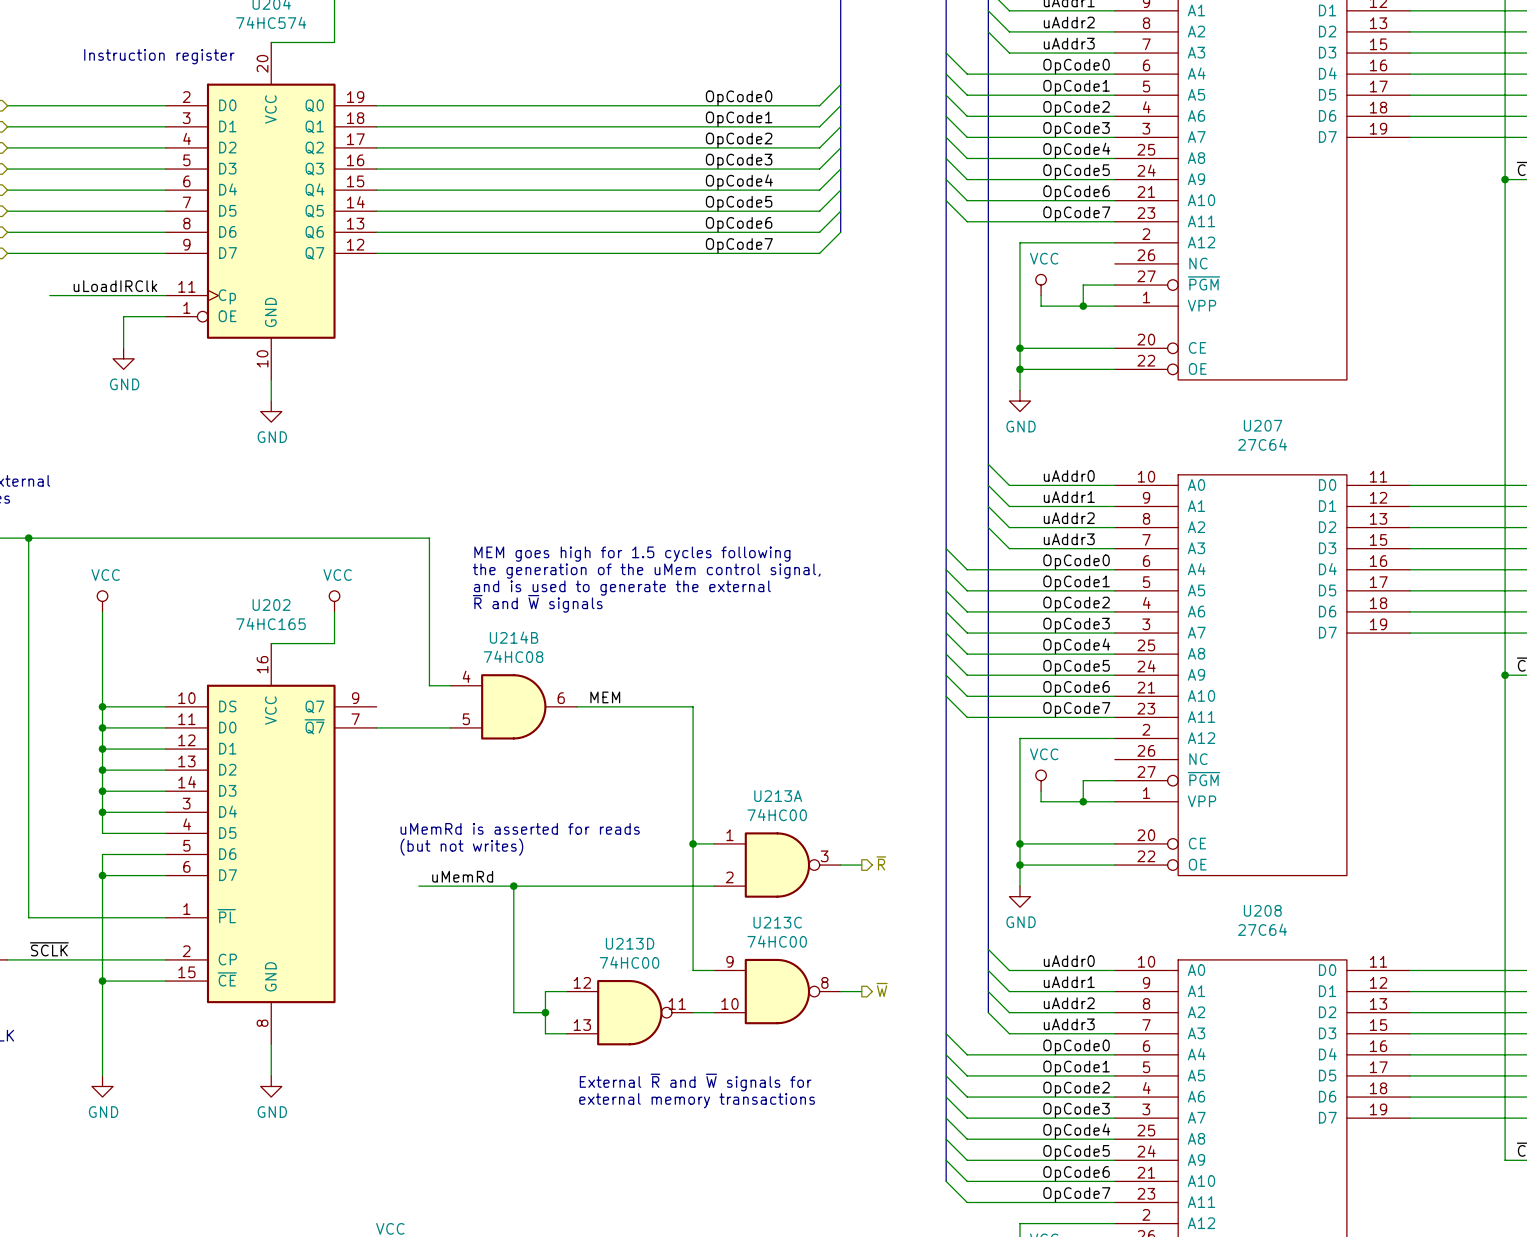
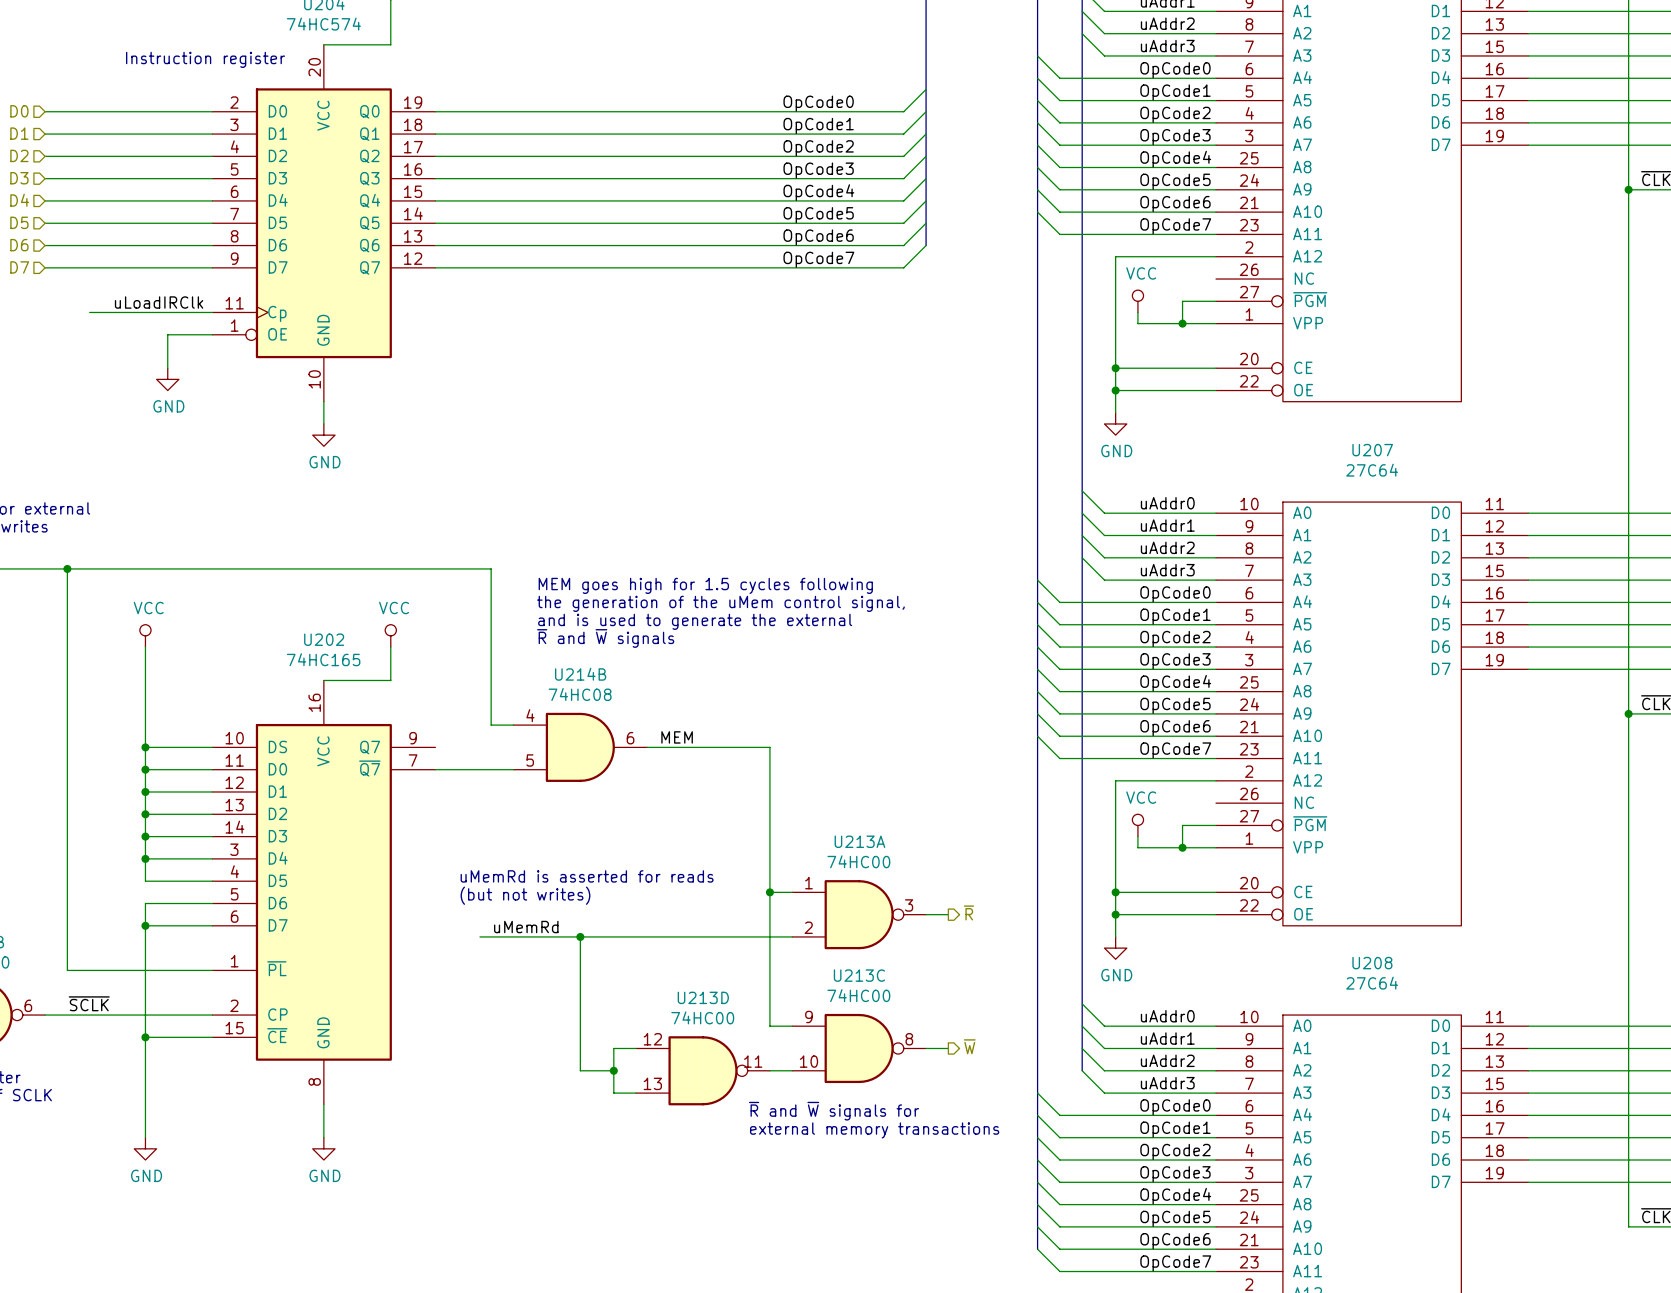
text: none -> ~{R} and ~{W} signals for (834, 1111)
text: External ~{R} and ~{W} signals for (695, 1082) -> none
text position: external memory transactions (697, 1100) -> external memory transactions (874, 1130)

